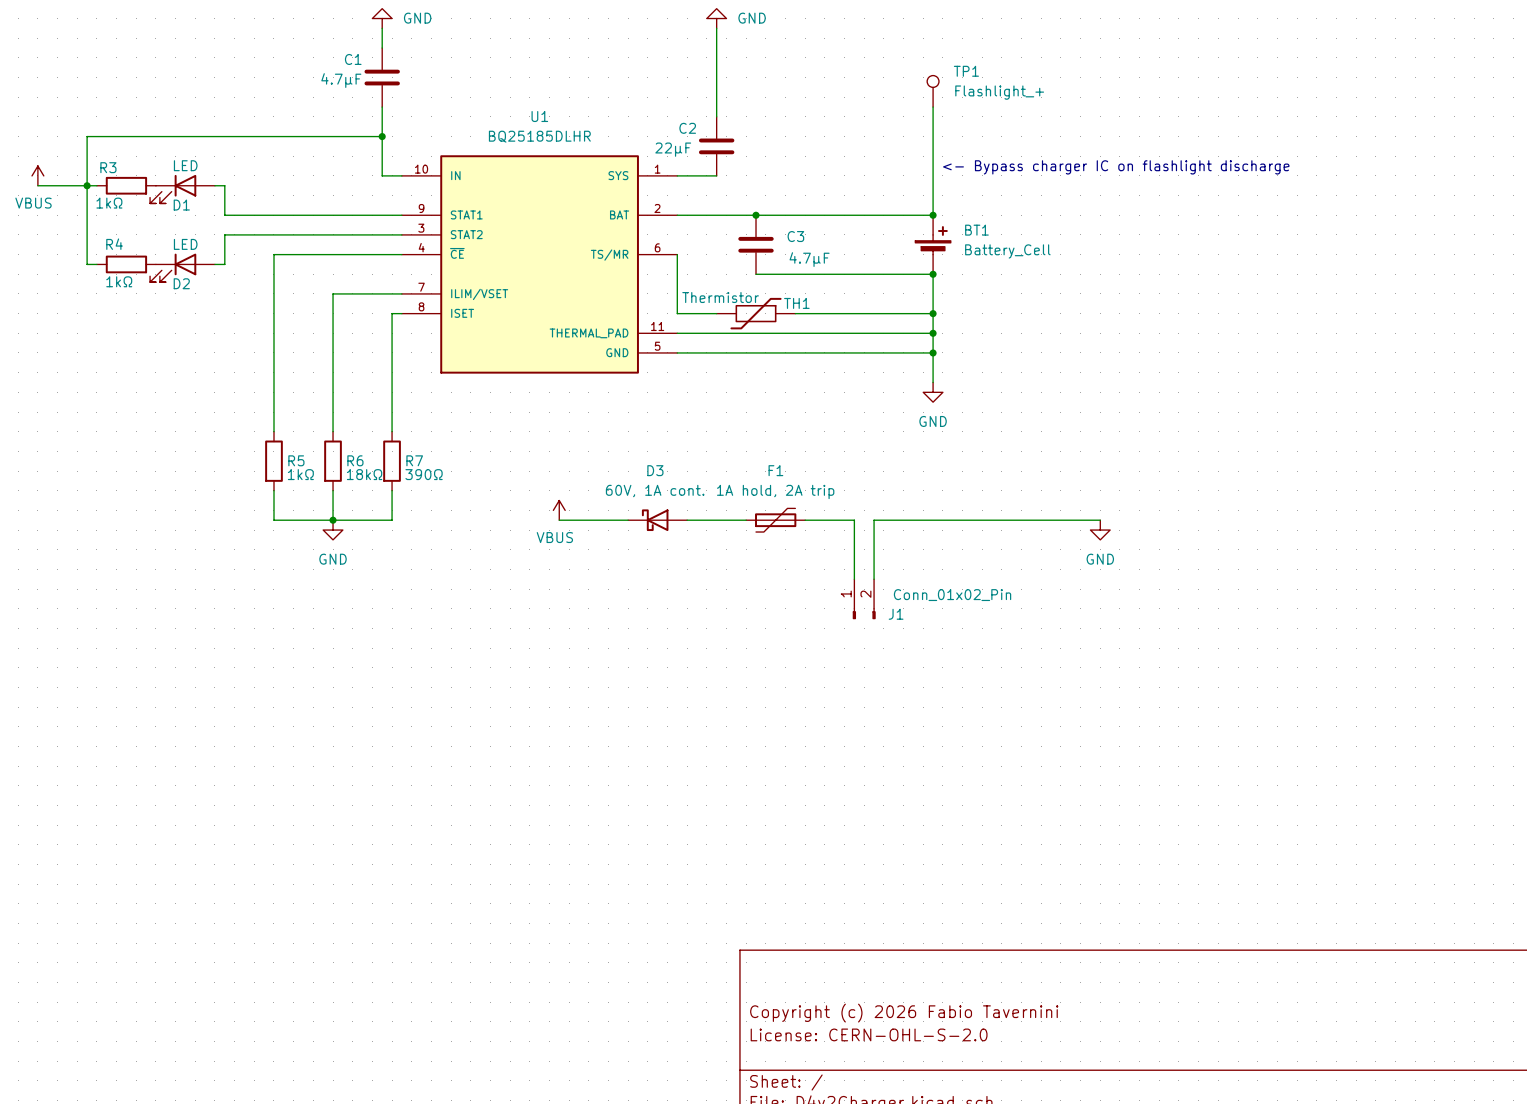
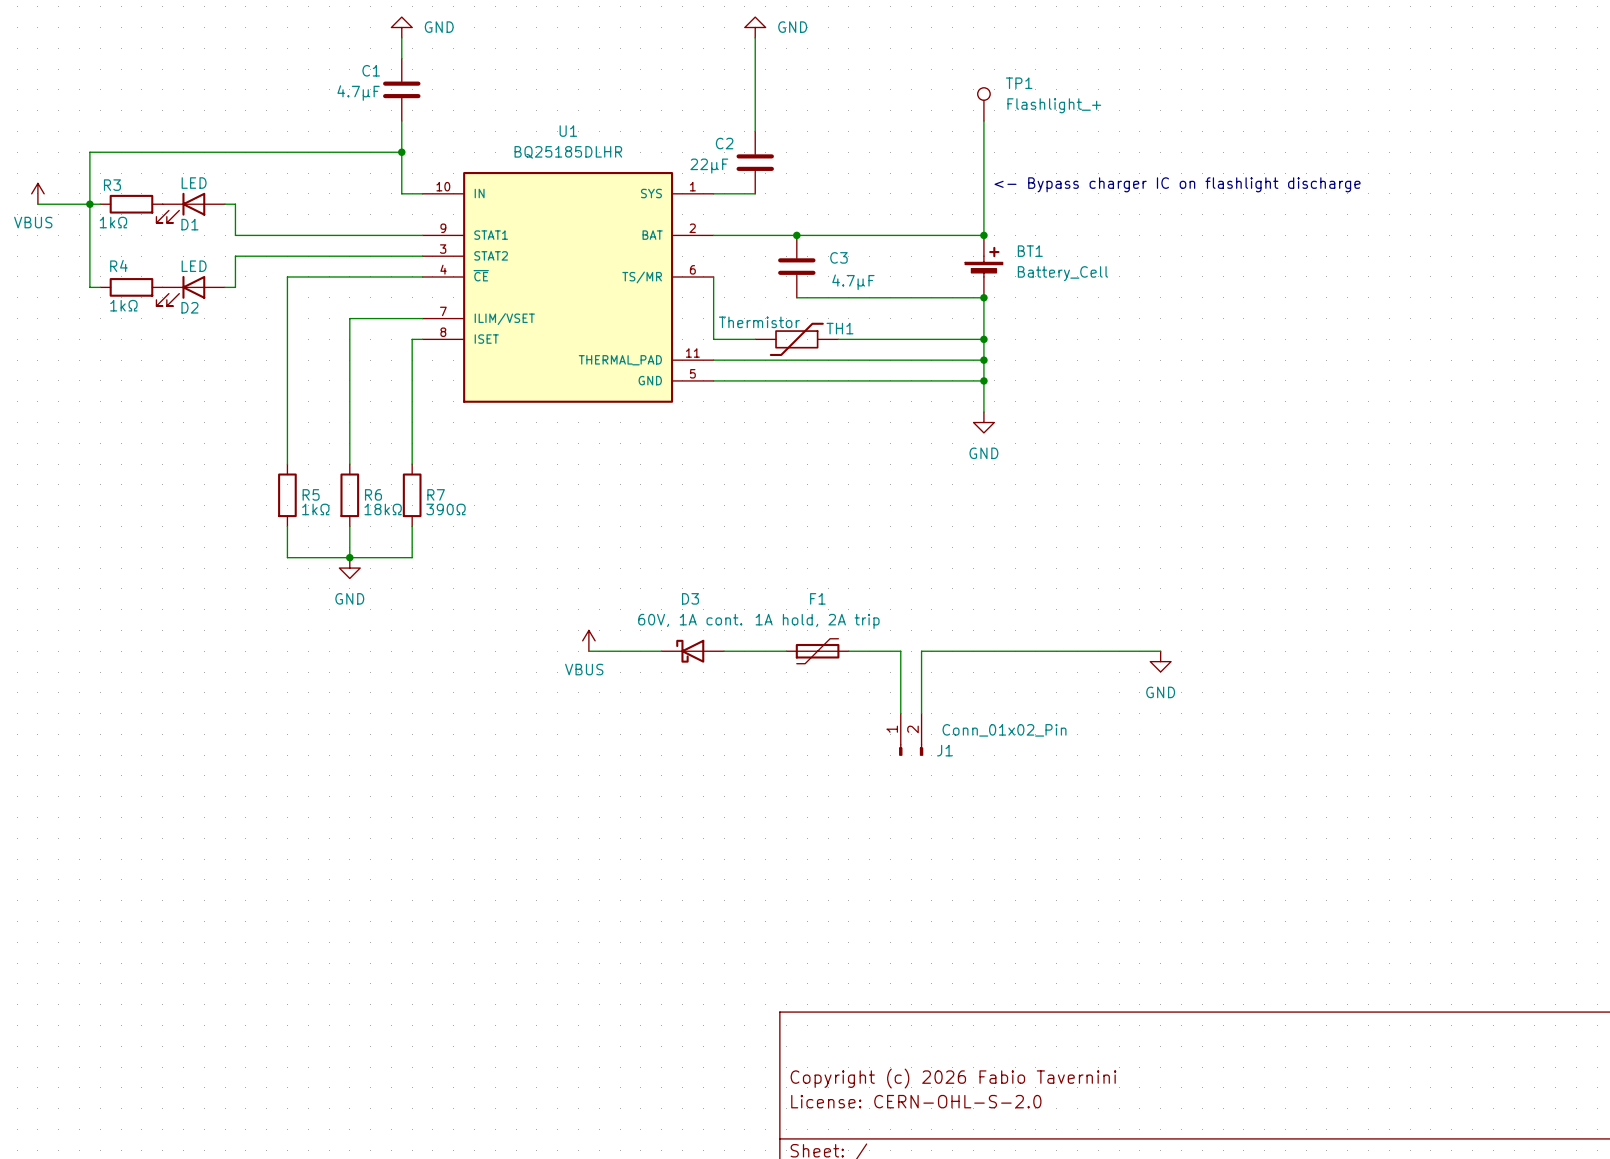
power symbol position: VBUS (559, 510) -> VBUS (588, 640)
wire: (559, 520) (628, 520) -> (588, 651) (661, 651)
D3 position: (657, 520) -> (692, 651)
wire: (687, 520) (746, 520) -> (724, 651) (786, 651)
F1 position: (775, 520) -> (817, 651)
wire: (805, 520) (854, 520) (854, 579) -> (848, 651) (900, 651) (900, 713)
wire: (1100, 520) (874, 520) (874, 579) -> (1160, 651) (921, 651) (921, 713)
power symbol position: GND (1100, 530) -> GND (1160, 661)
J1 position: (864, 599) -> (911, 734)

